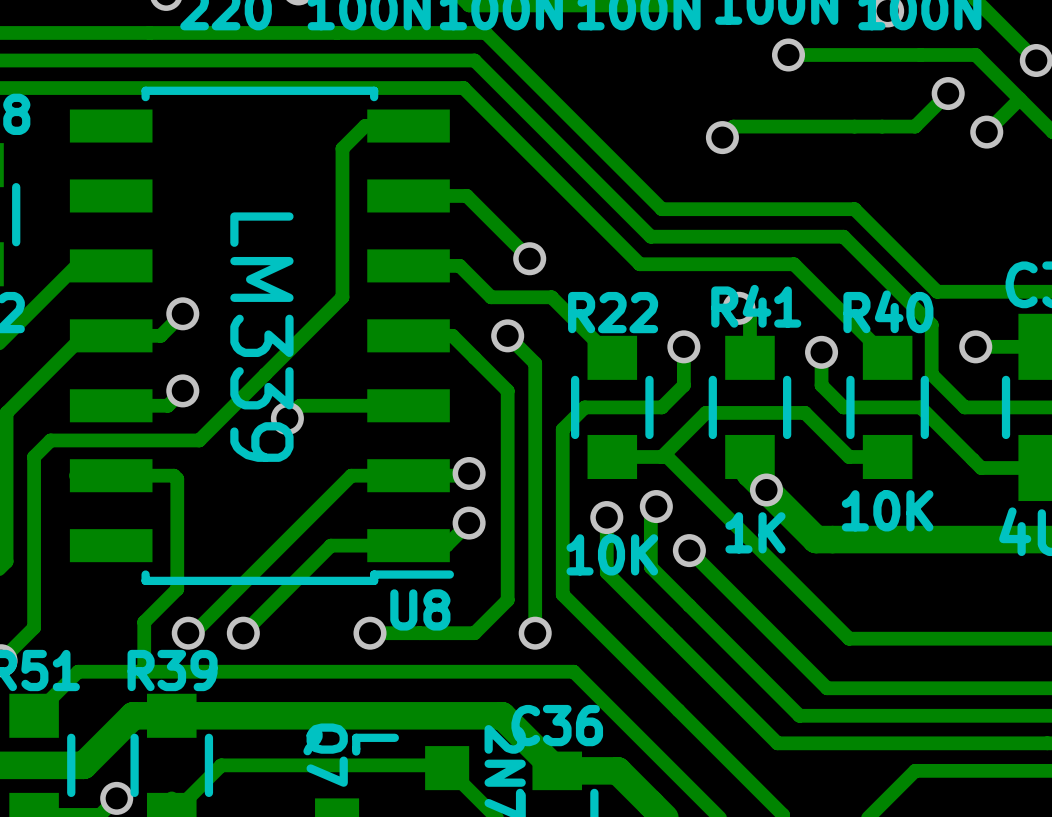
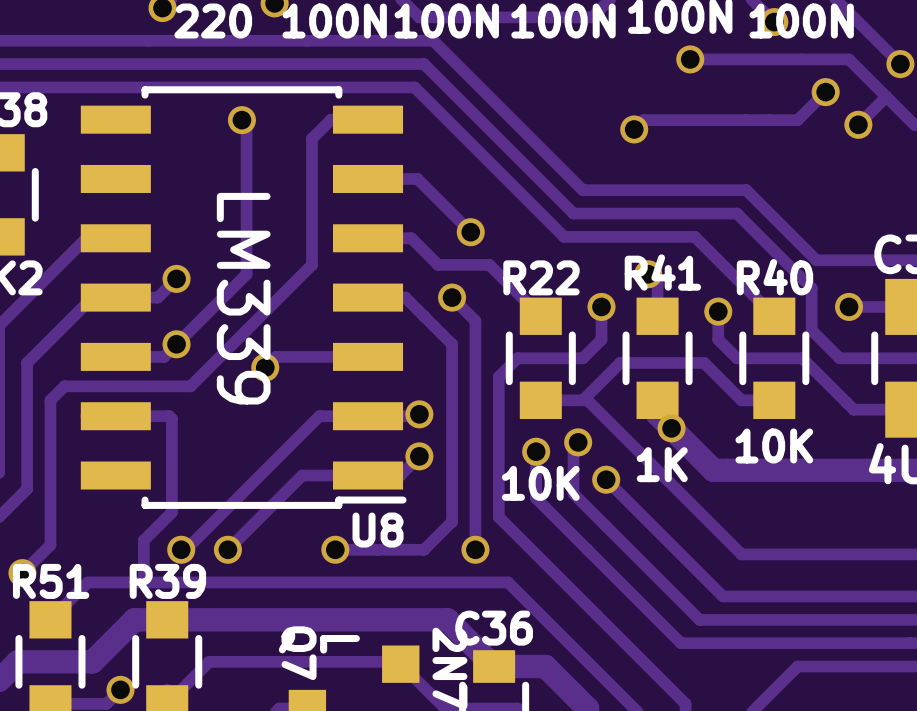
track: none -> (241, 120) (246, 124) (246, 274) (176, 344)
via: none -> (241, 120)

